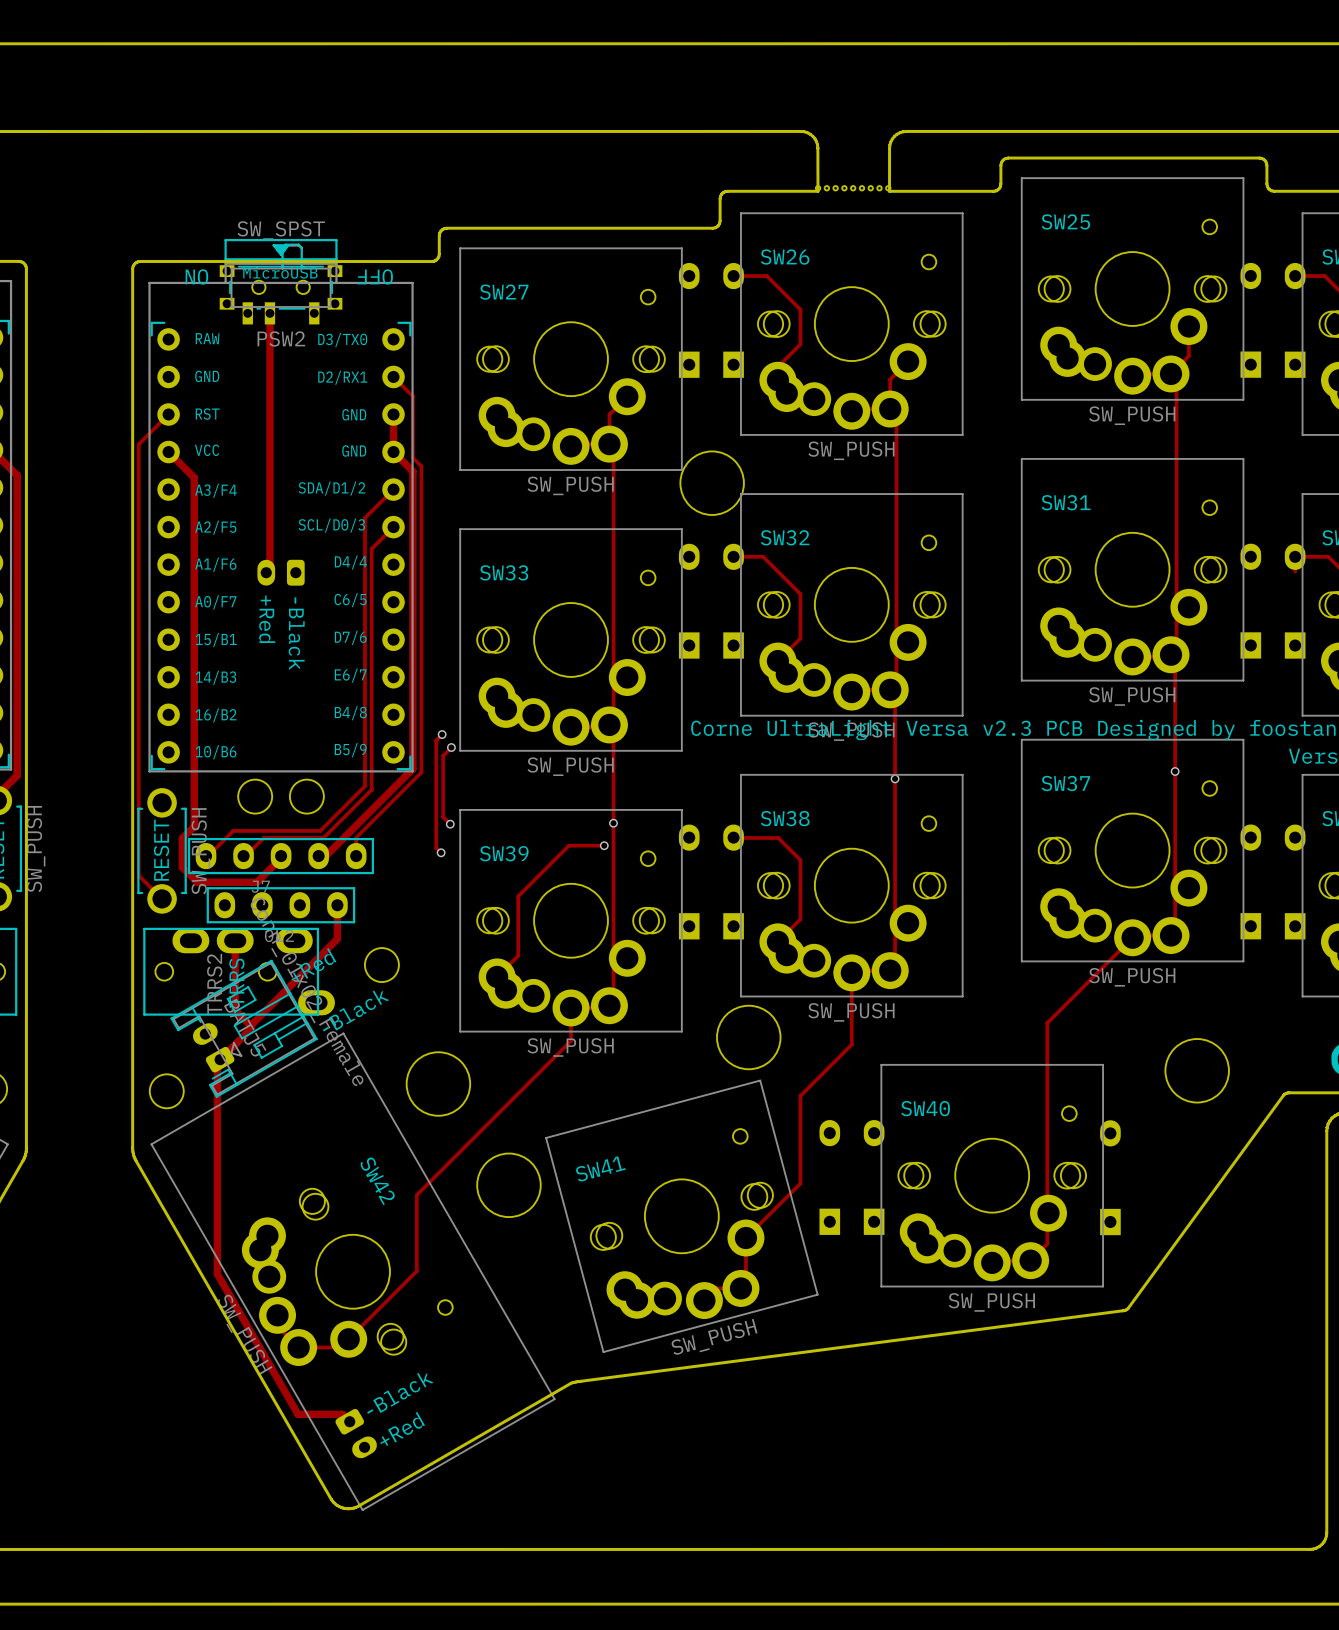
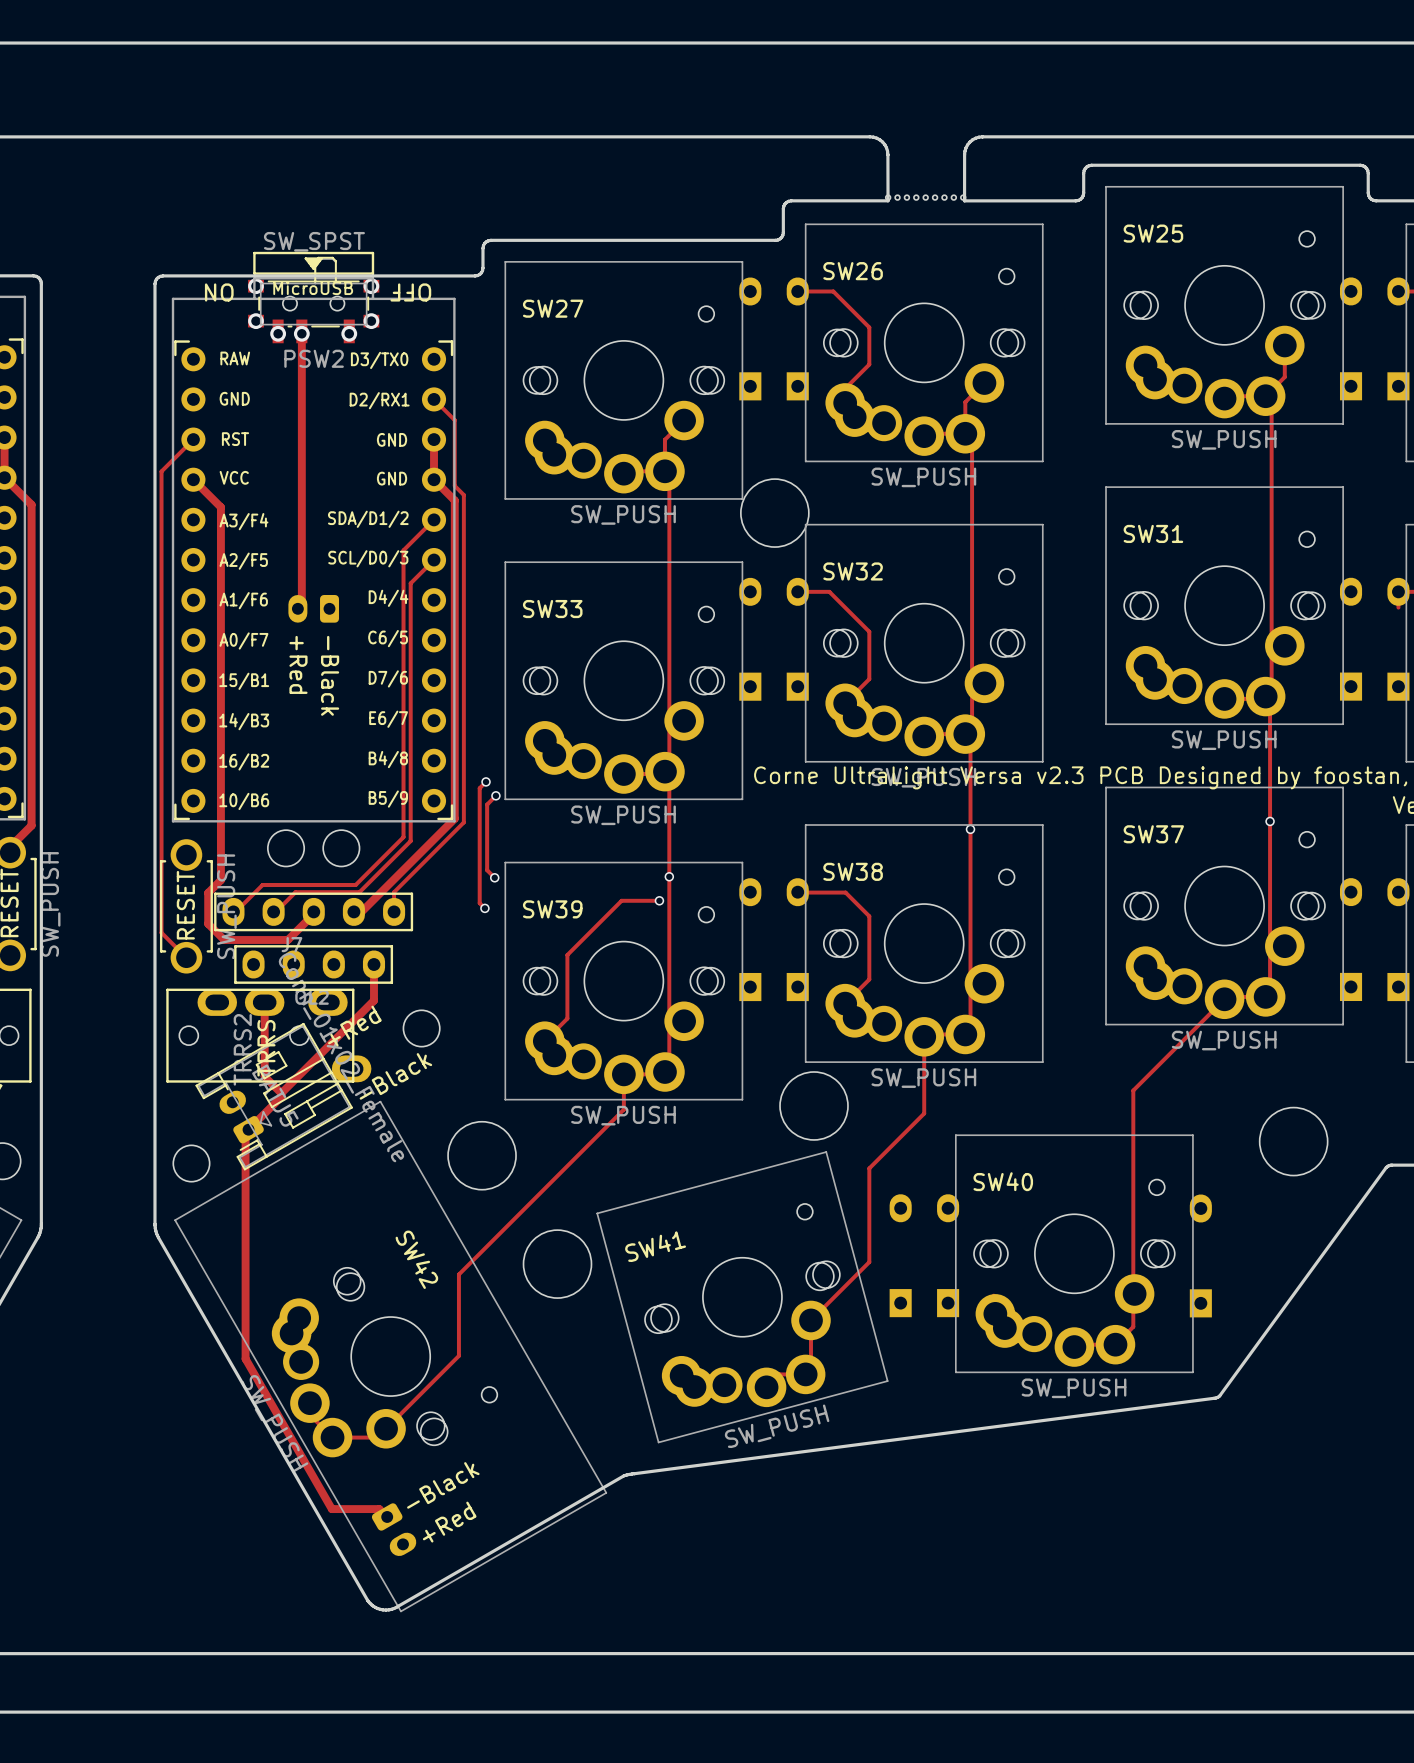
PSW2 footprint: [219, 243, 343, 325] -> [248, 256, 380, 344]
via: none -> (256, 286)
via: none -> (371, 286)
via: none -> (256, 321)
via: none -> (371, 321)
via: none -> (278, 333)
via: none -> (301, 333)
via: none -> (349, 333)

